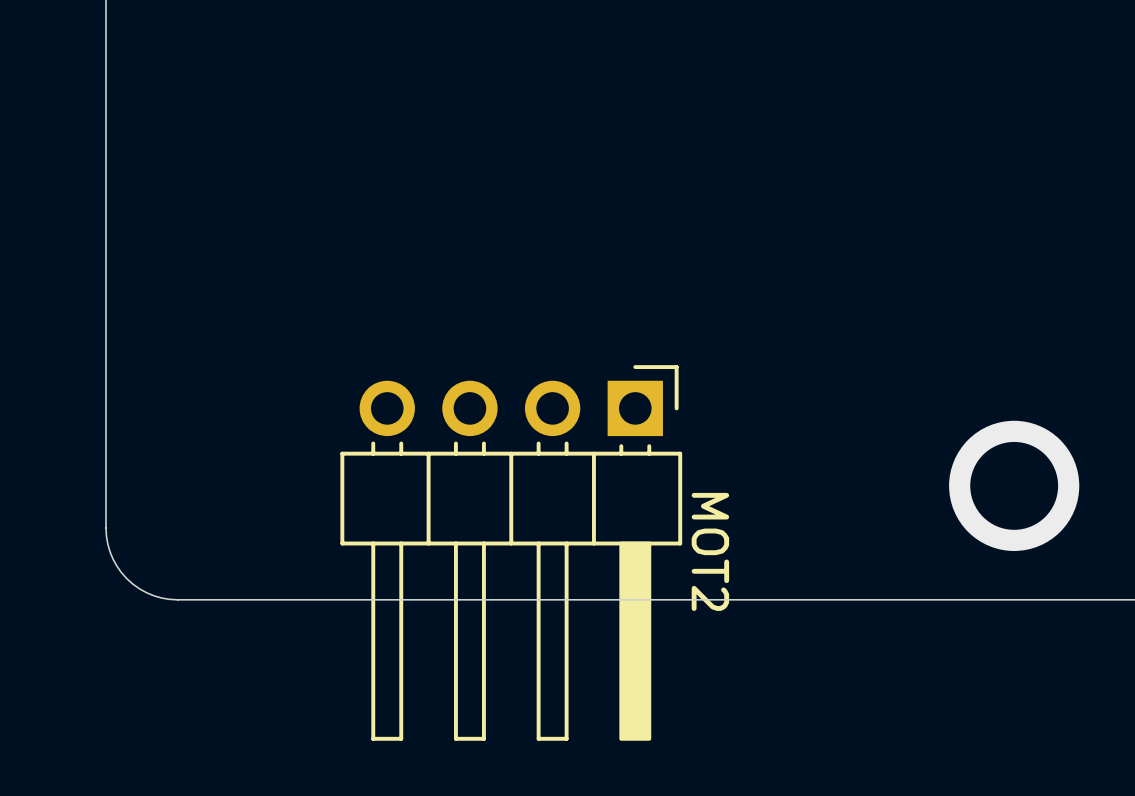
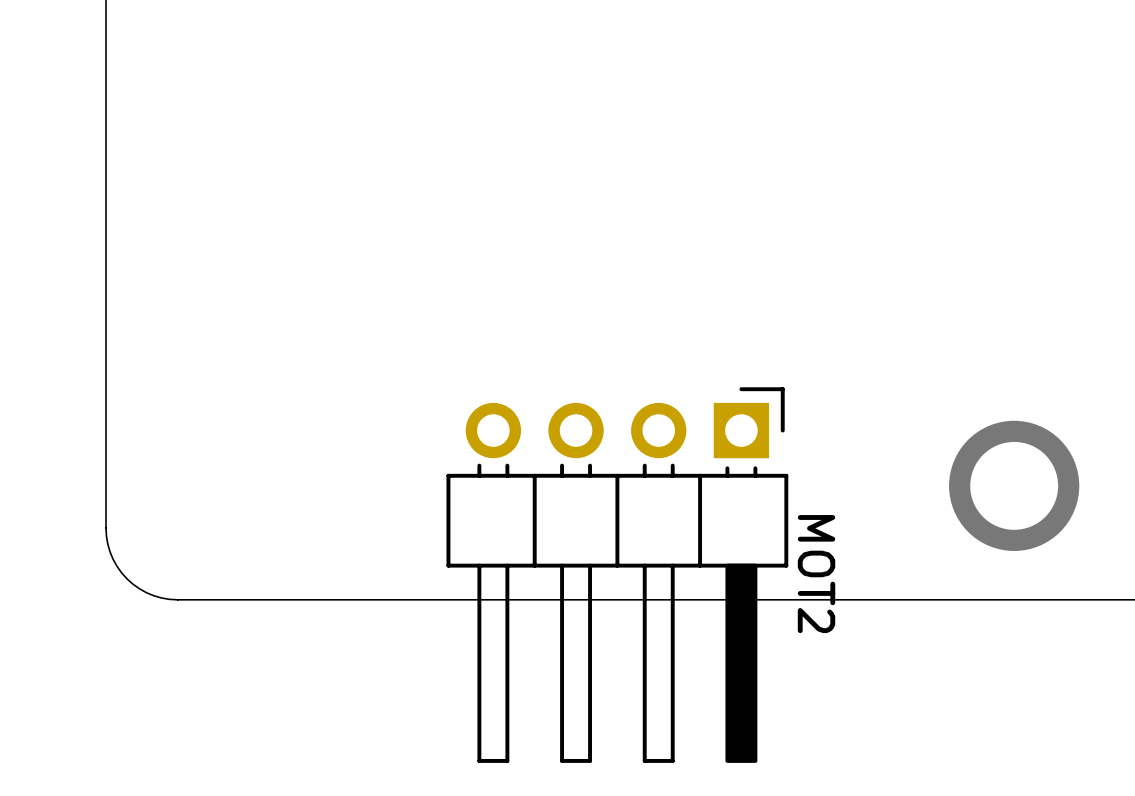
MOT2 position: (511, 552) -> (617, 575)

